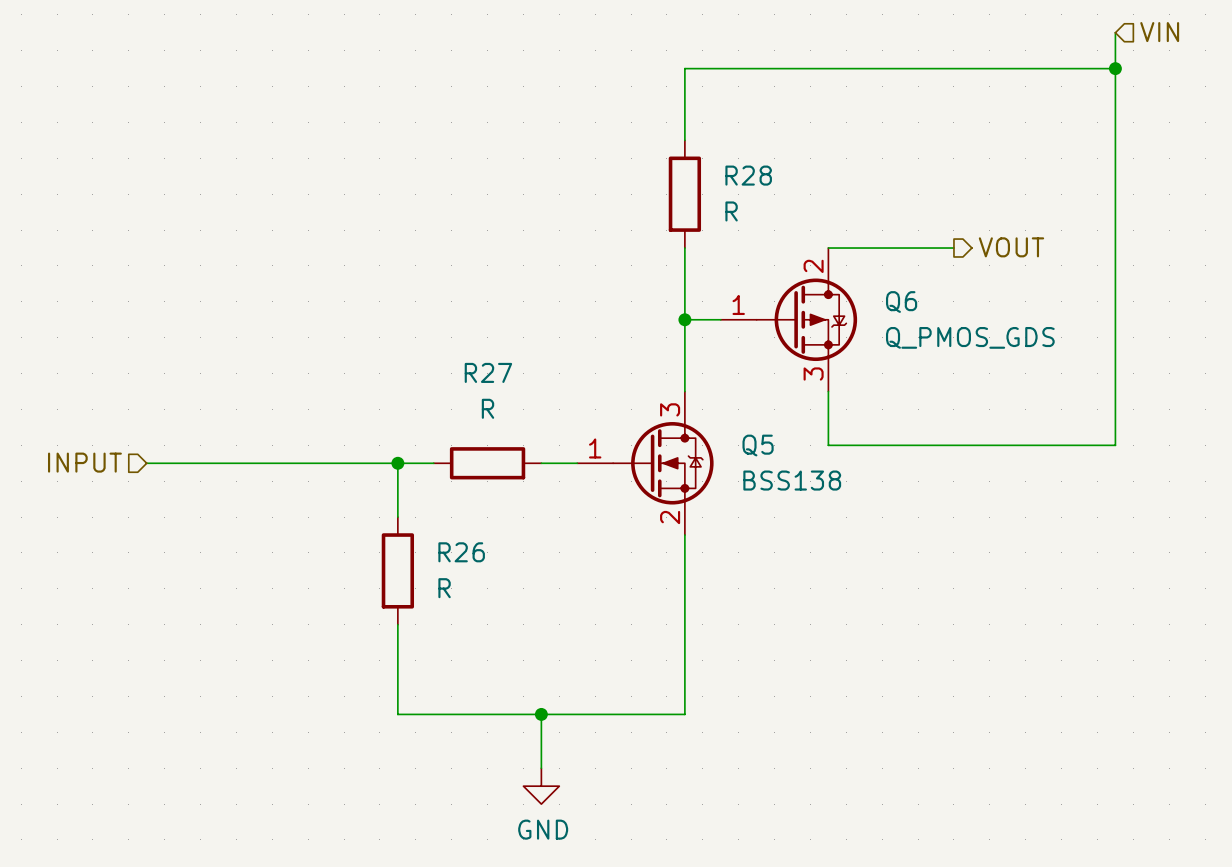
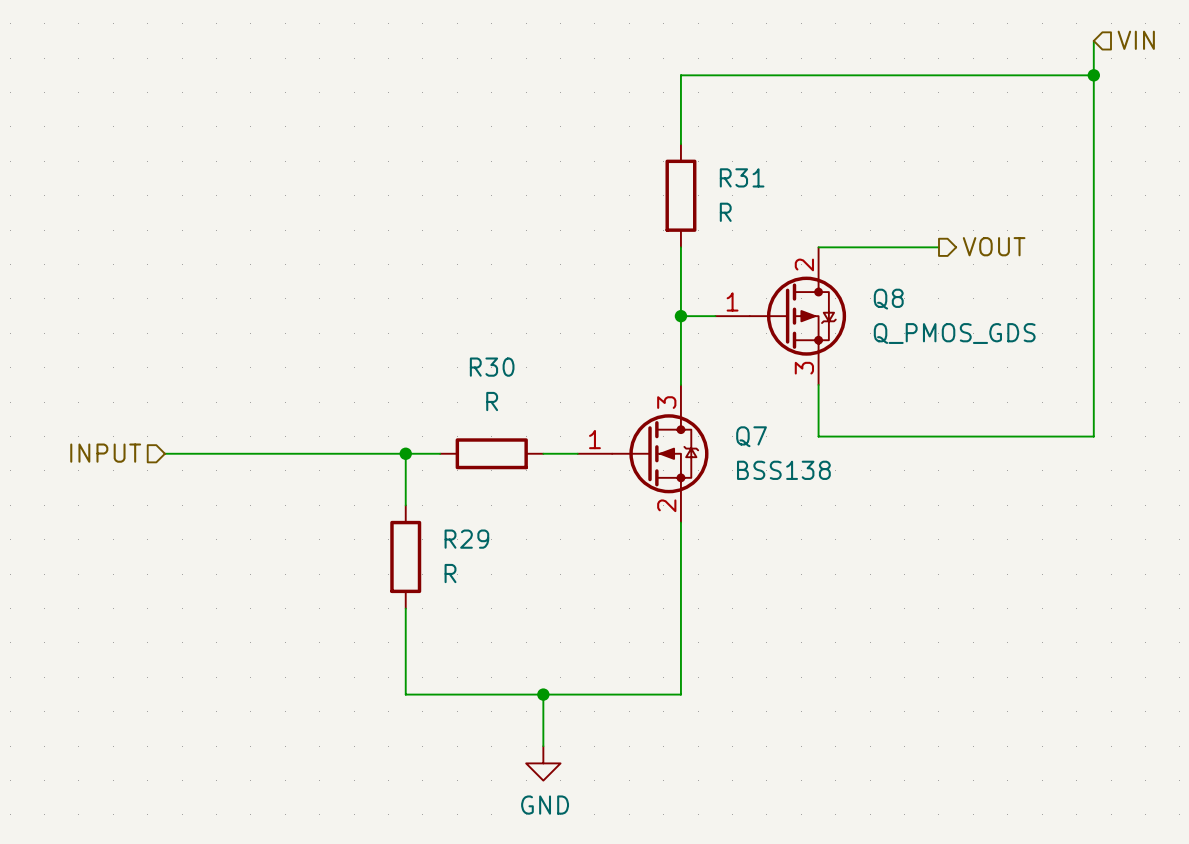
R28 name: R28 (748, 175) -> R31 (742, 177)
Q6 name: Q6 (901, 302) -> Q8 (888, 299)
R27 name: R27 (488, 372) -> R30 (492, 367)
Q5 name: Q5 (758, 445) -> Q7 (751, 436)
R26 name: R26 (461, 552) -> R29 (466, 539)

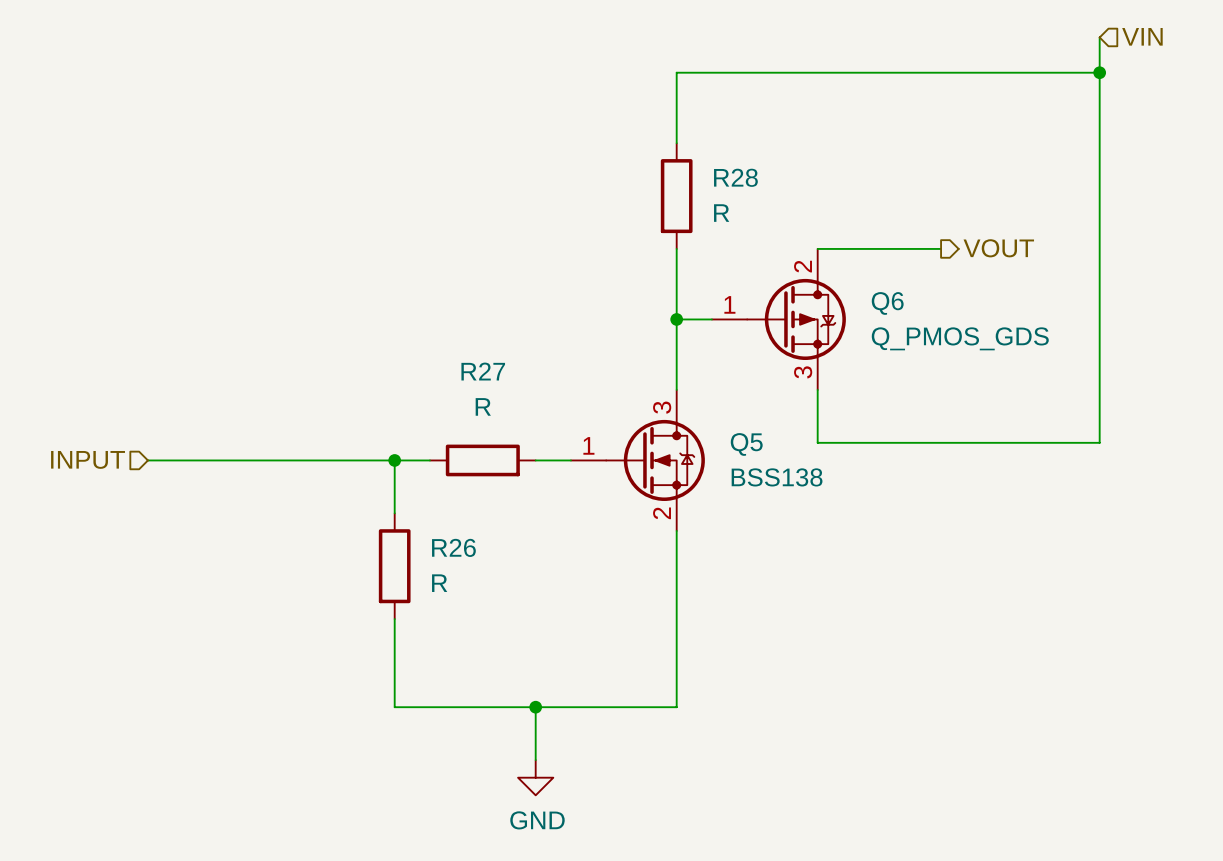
R31 name: R31 (742, 177) -> R28 (735, 177)
Q8 name: Q8 (888, 299) -> Q6 (887, 303)
R30 name: R30 (492, 367) -> R27 (483, 371)
Q7 name: Q7 (751, 436) -> Q5 (746, 444)
R29 name: R29 (466, 539) -> R26 (453, 547)

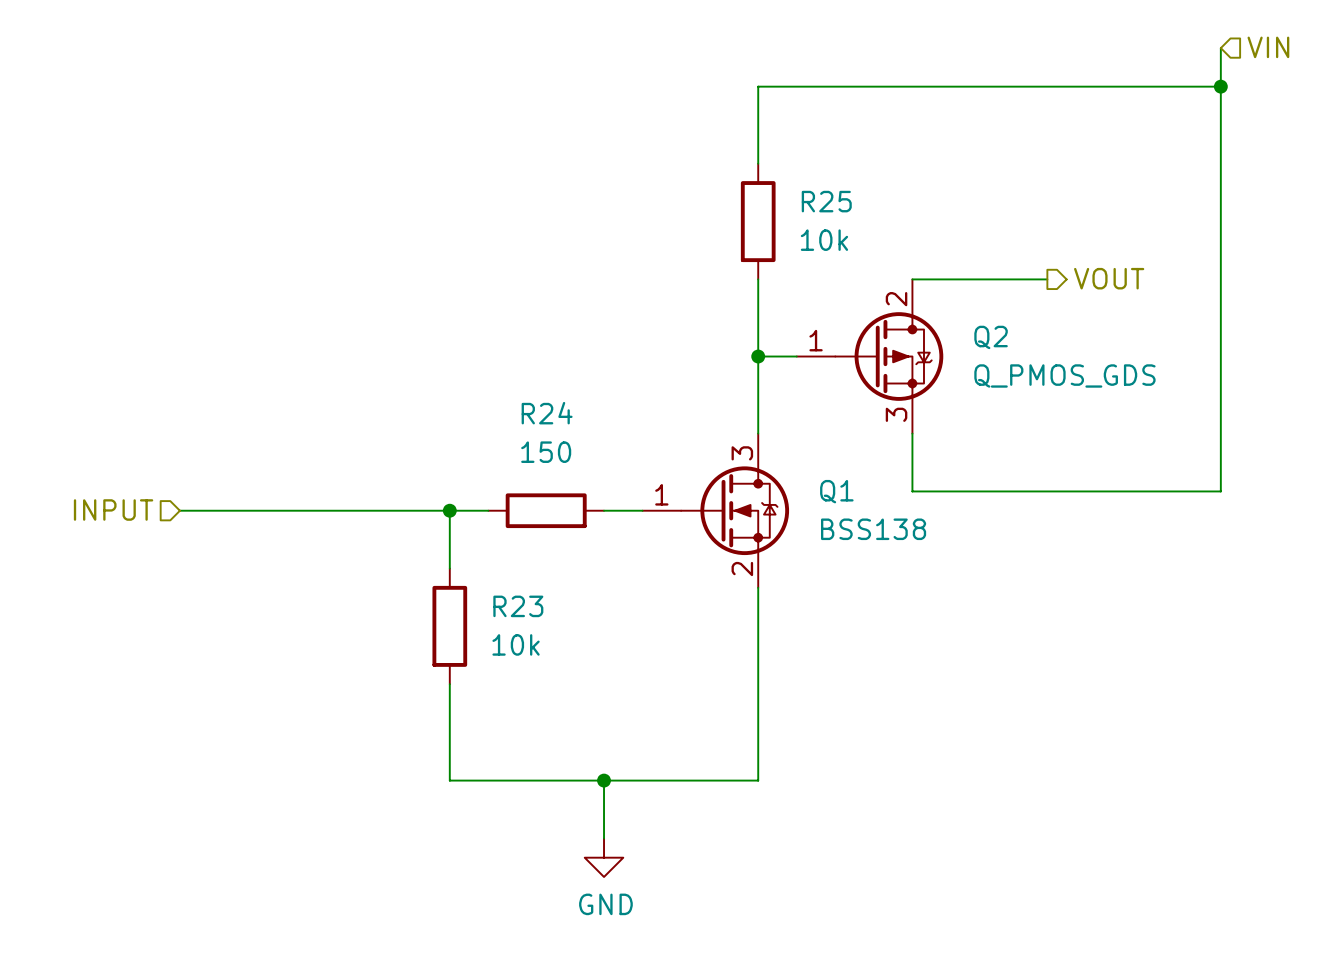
R28 name: R28 (735, 177) -> R25 (826, 201)
R28 value: R (721, 213) -> 10k (824, 240)
Q6 name: Q6 (887, 303) -> Q2 (991, 337)
R27 name: R27 (483, 371) -> R24 (547, 413)
R27 value: R (483, 406) -> 150 (546, 452)
Q5 name: Q5 (746, 444) -> Q1 (836, 491)
R26 name: R26 (453, 547) -> R23 (518, 606)
R26 value: R (439, 583) -> 10k (516, 644)

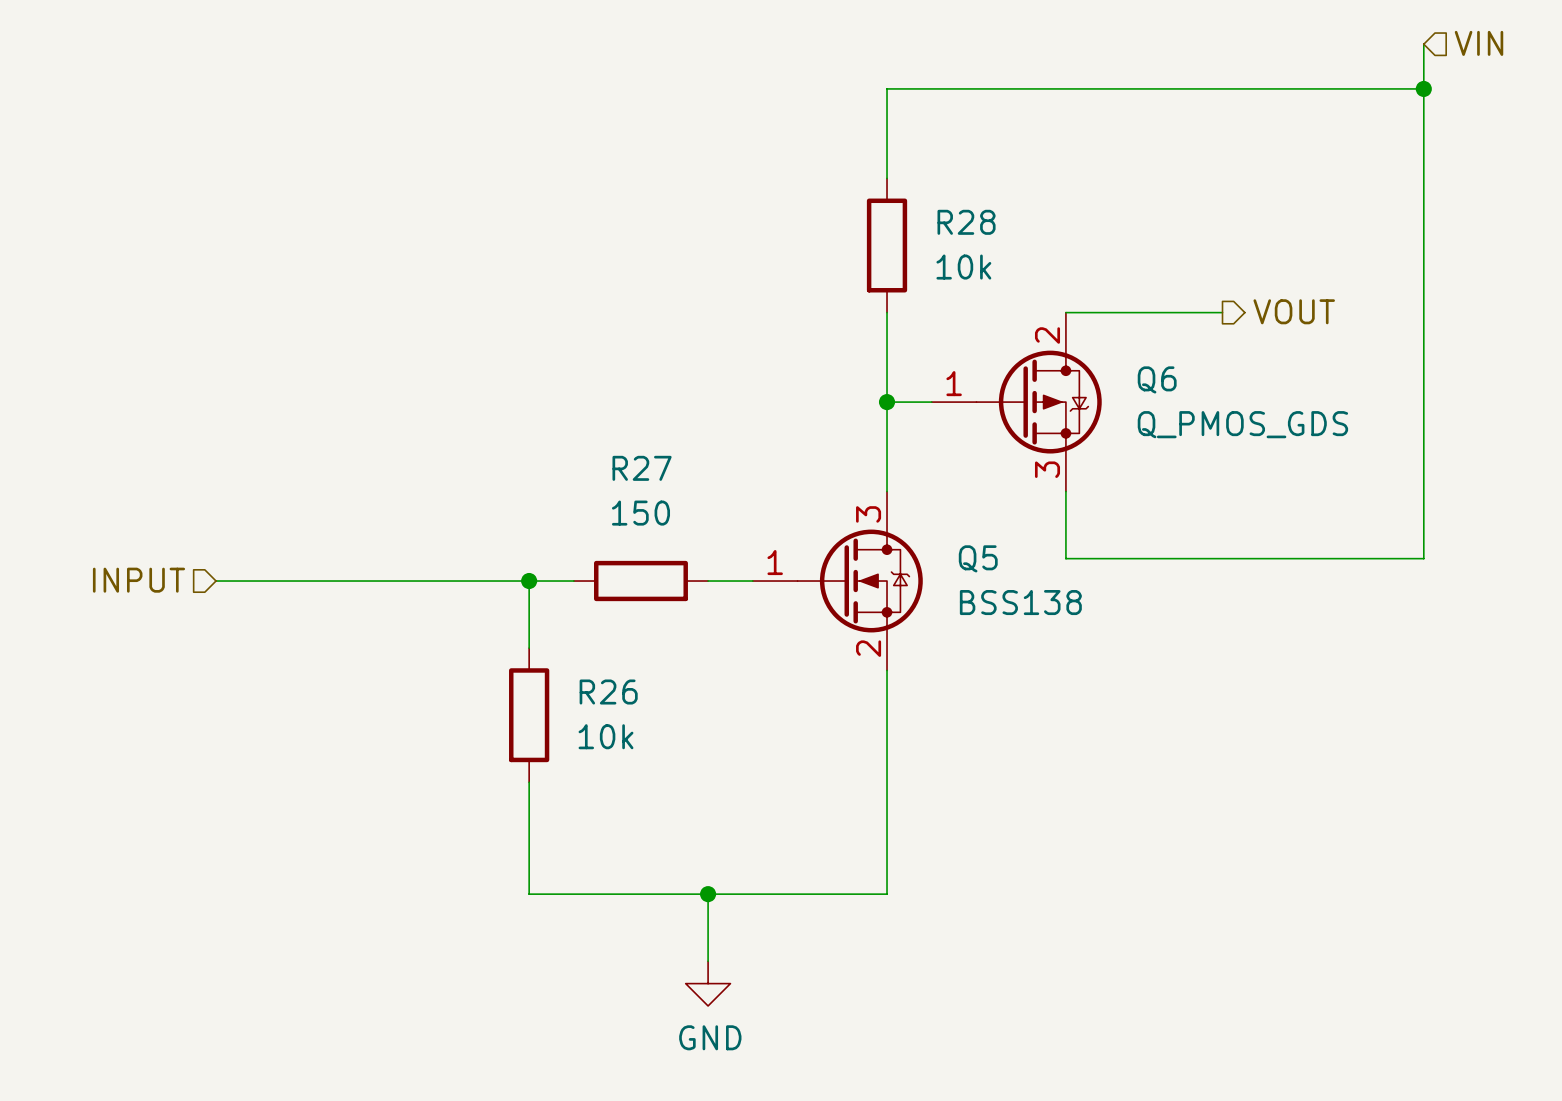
R25 name: R25 (826, 201) -> R28 (966, 222)
Q2 name: Q2 (991, 337) -> Q6 (1157, 379)
R24 name: R24 (547, 413) -> R27 (642, 468)
Q1 name: Q1 (836, 491) -> Q5 (978, 558)
R23 name: R23 (518, 606) -> R26 (608, 692)

